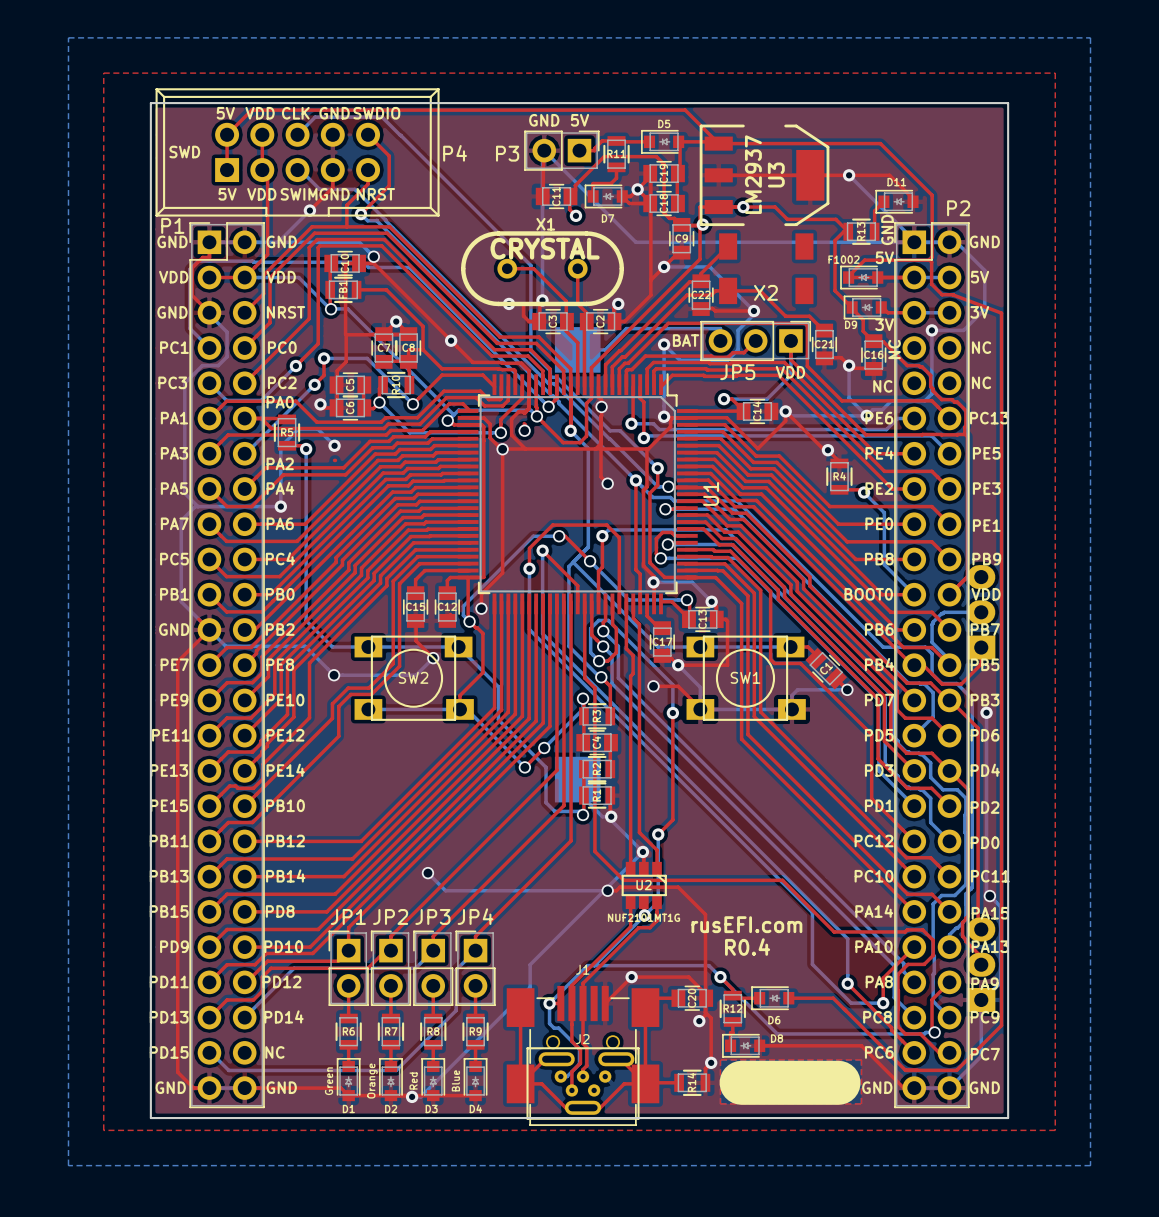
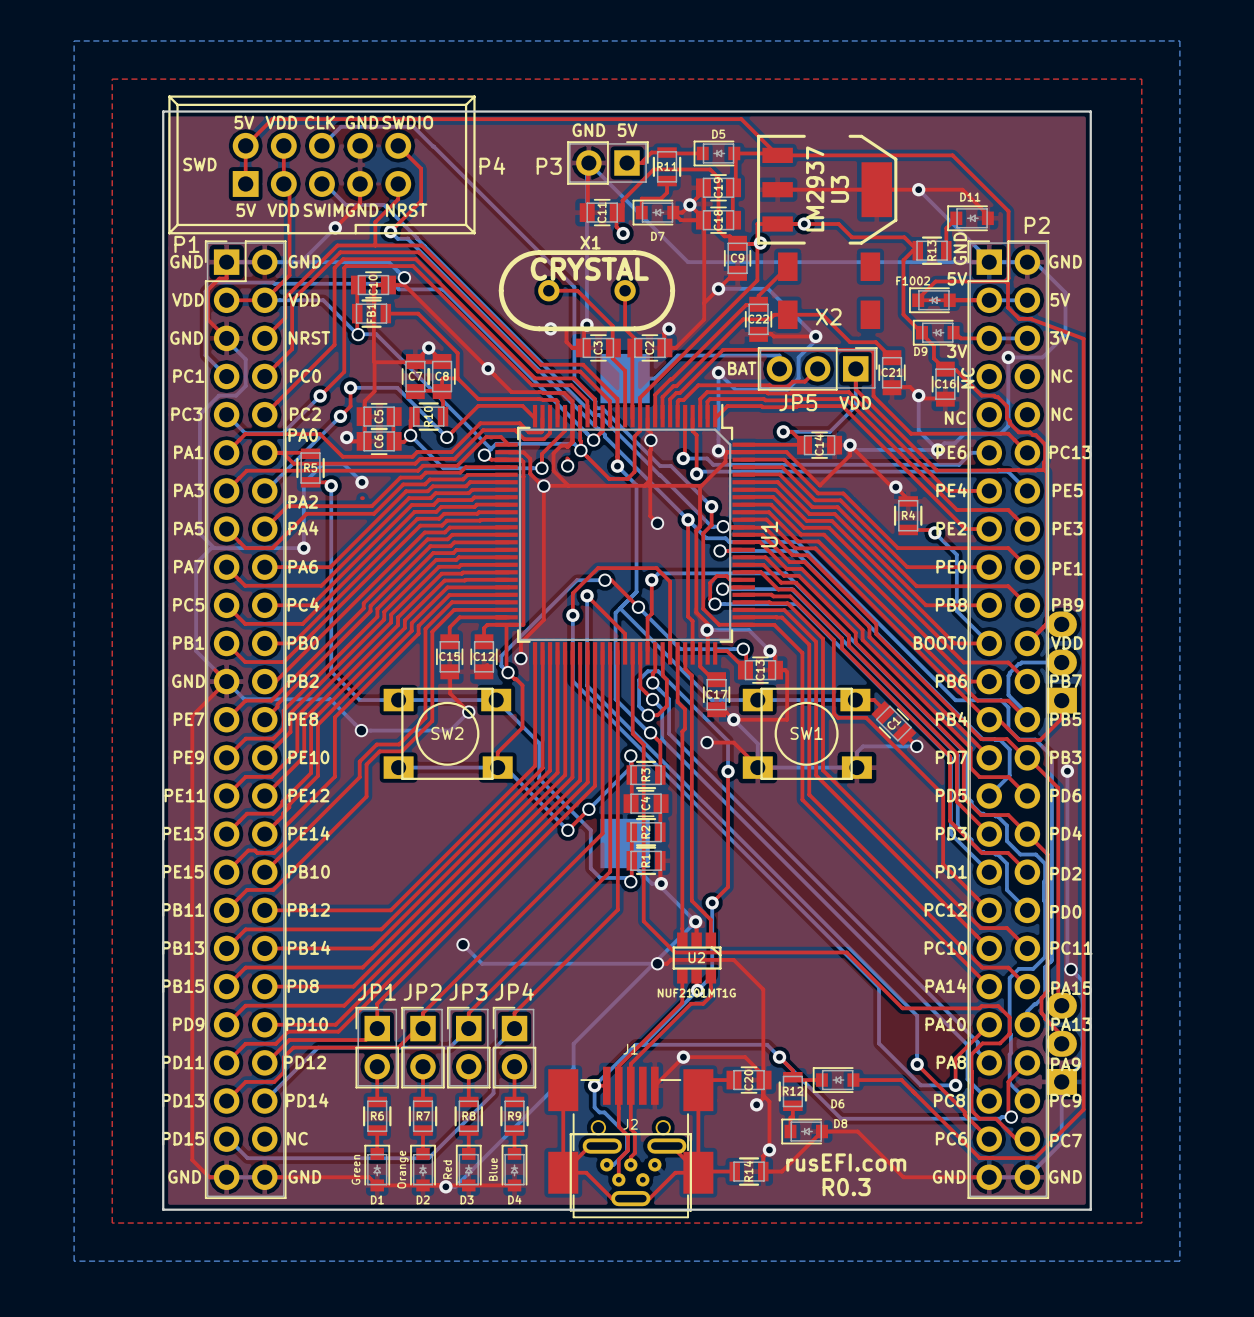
text position: rusEFI.com (746, 924) -> rusEFI.com (846, 1162)
text: R0.4 (747, 947) -> none
top track: none -> (821, 1131) (781, 1171) (763, 1171)
top track: (792, 1045) (861, 1045) (903, 1088) -> (857, 1131) (903, 1177) (977, 1177)
top zone outline: (720, 1059) (720, 1103) (861, 1103) (861, 1059) (720, 1059) -> none
line: (741, 1082) (838, 1082) -> none
text: none -> R0.3 (846, 1187)

